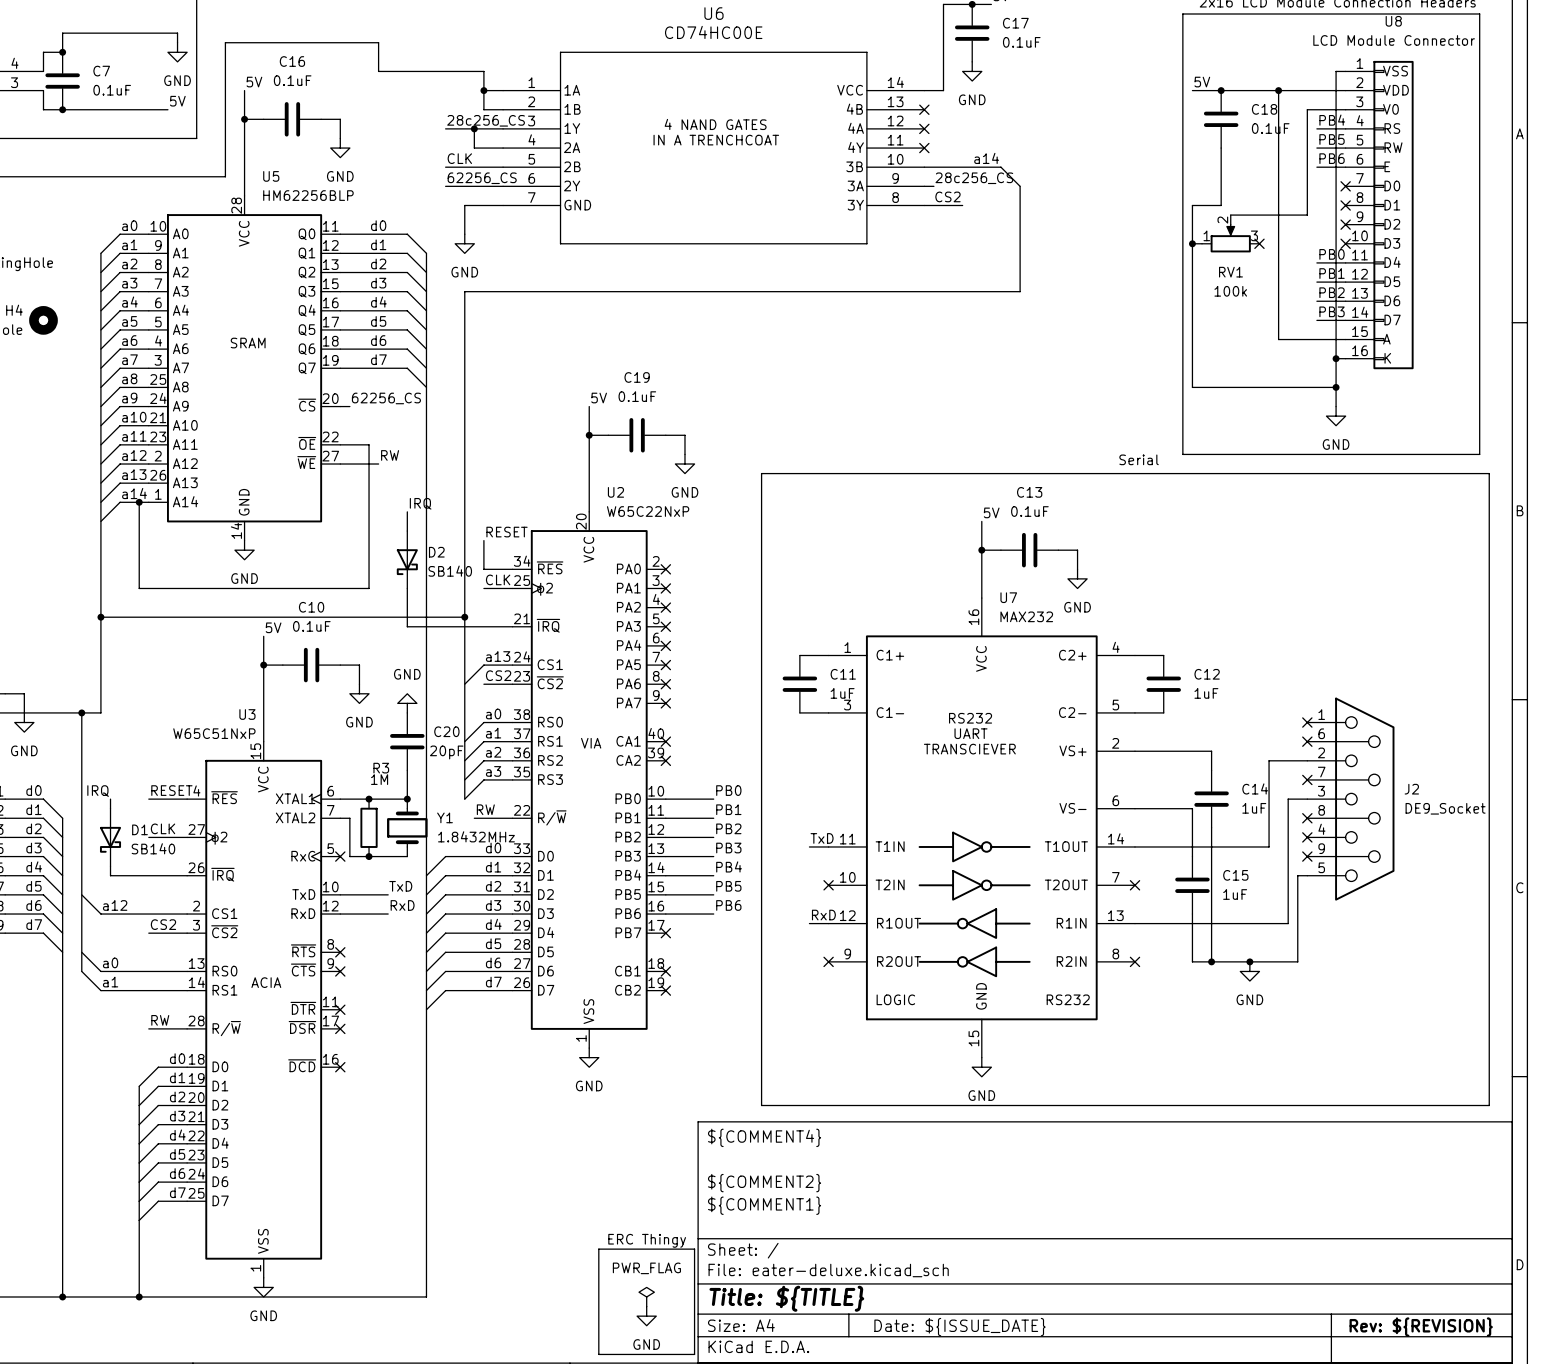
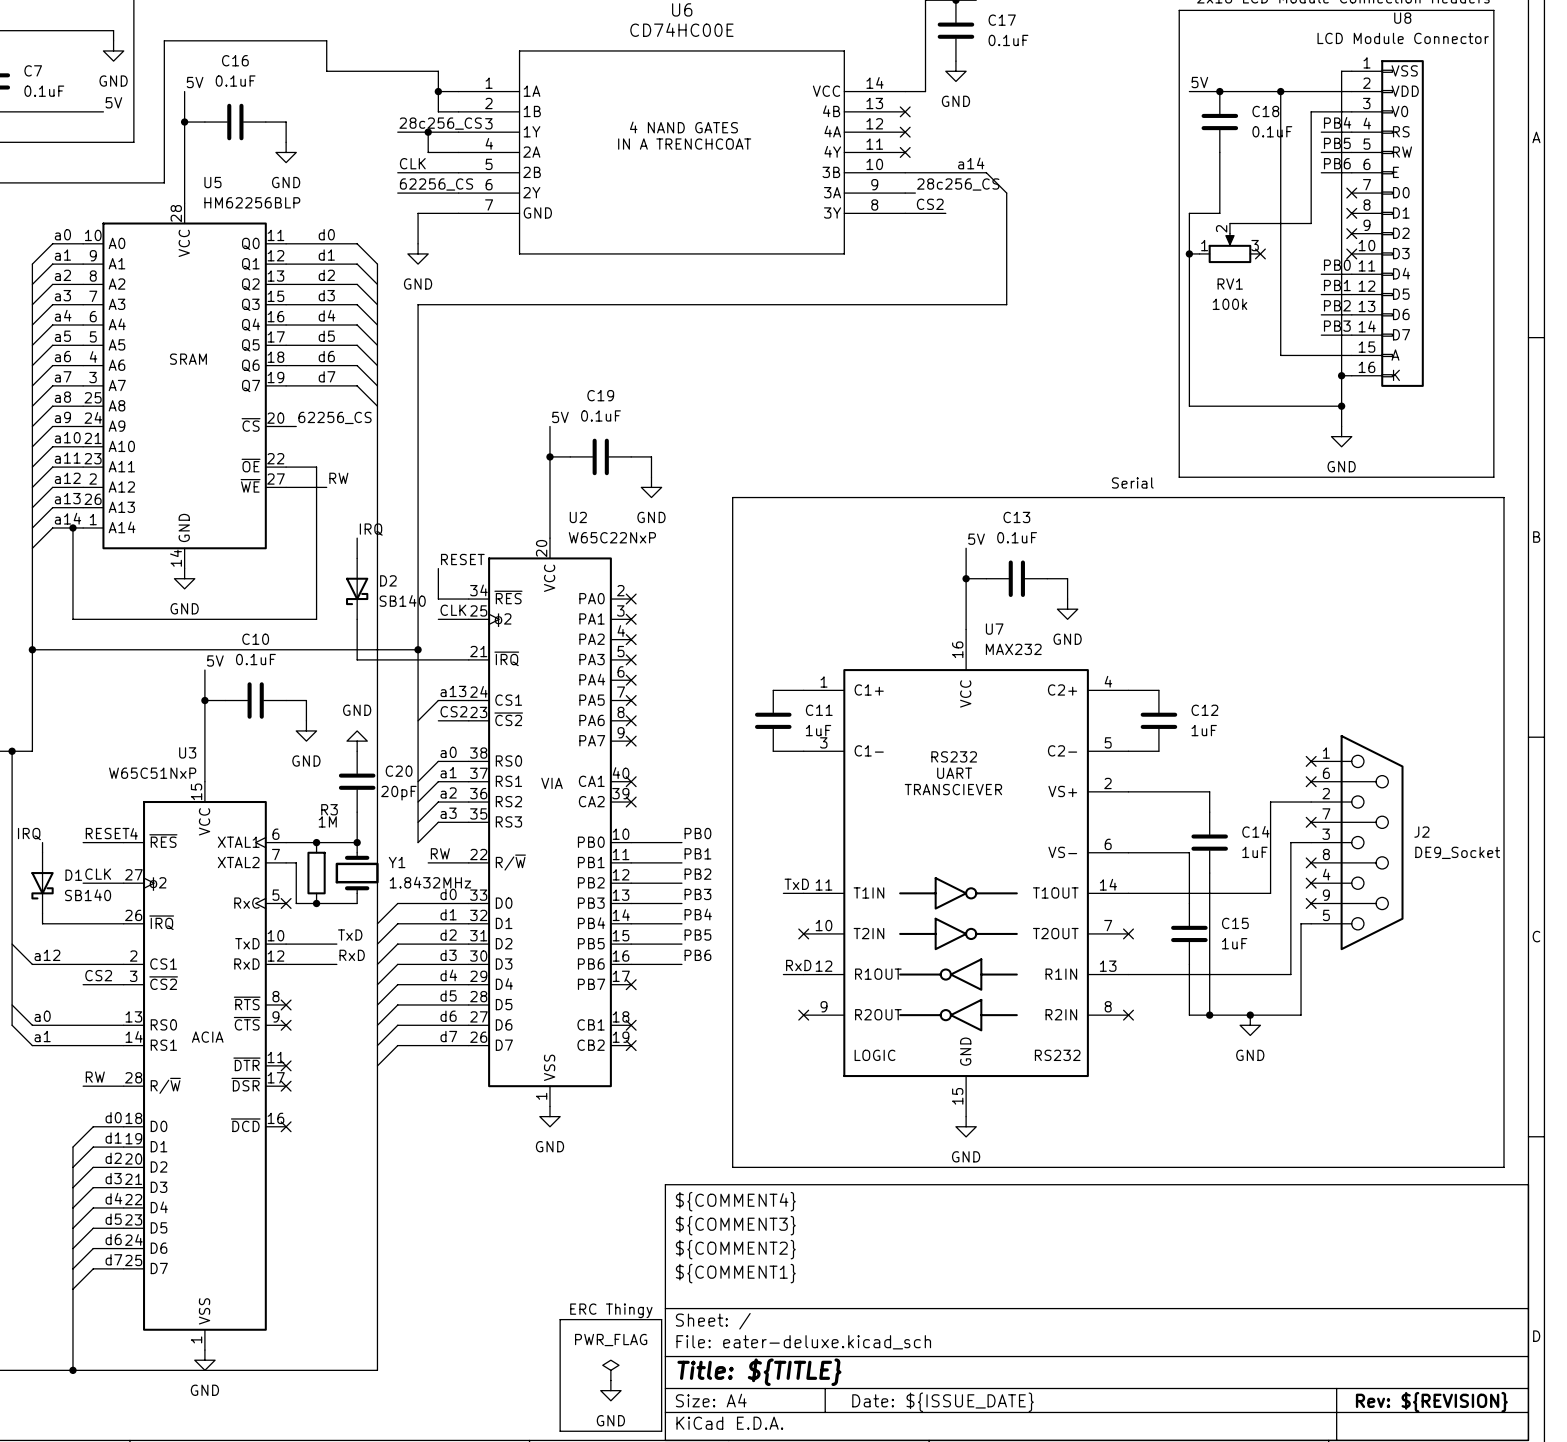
title block: none -> ${COMMENT3} (735, 1225)

